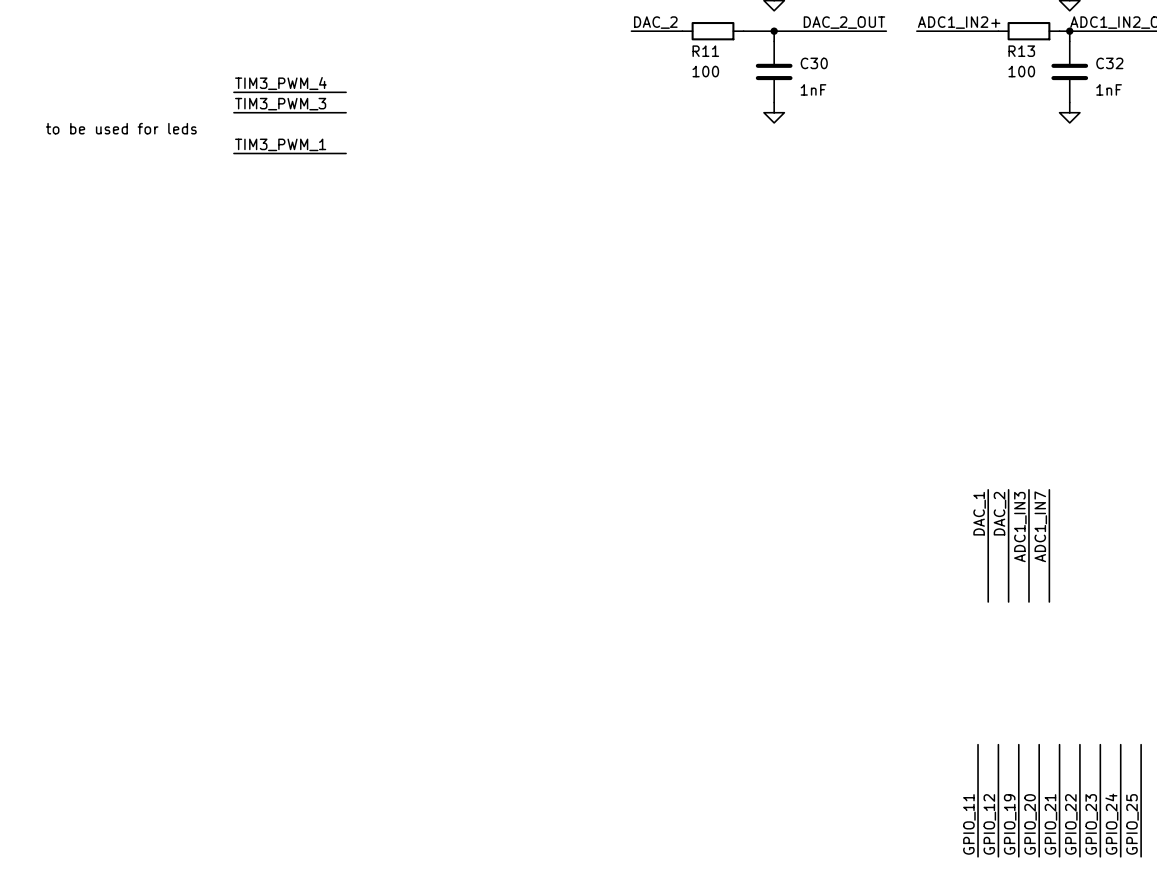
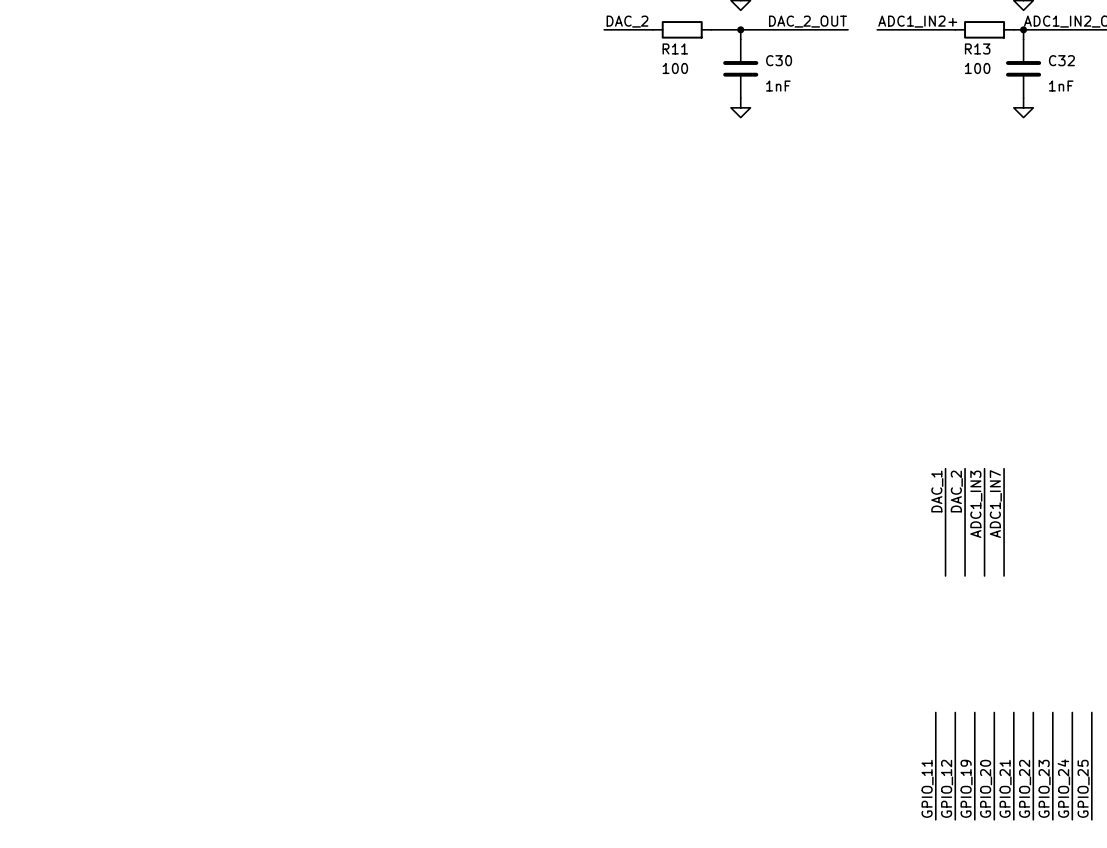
label: TIM3_PWM_4 (280, 83) -> none
wire: (233, 92) (346, 92) -> none
label: TIM3_PWM_3 (280, 104) -> none
wire: (233, 112) (346, 112) -> none
text: to be used for leds (121, 128) -> none
label: TIM3_PWM_1 (280, 144) -> none
wire: (233, 153) (346, 153) -> none

